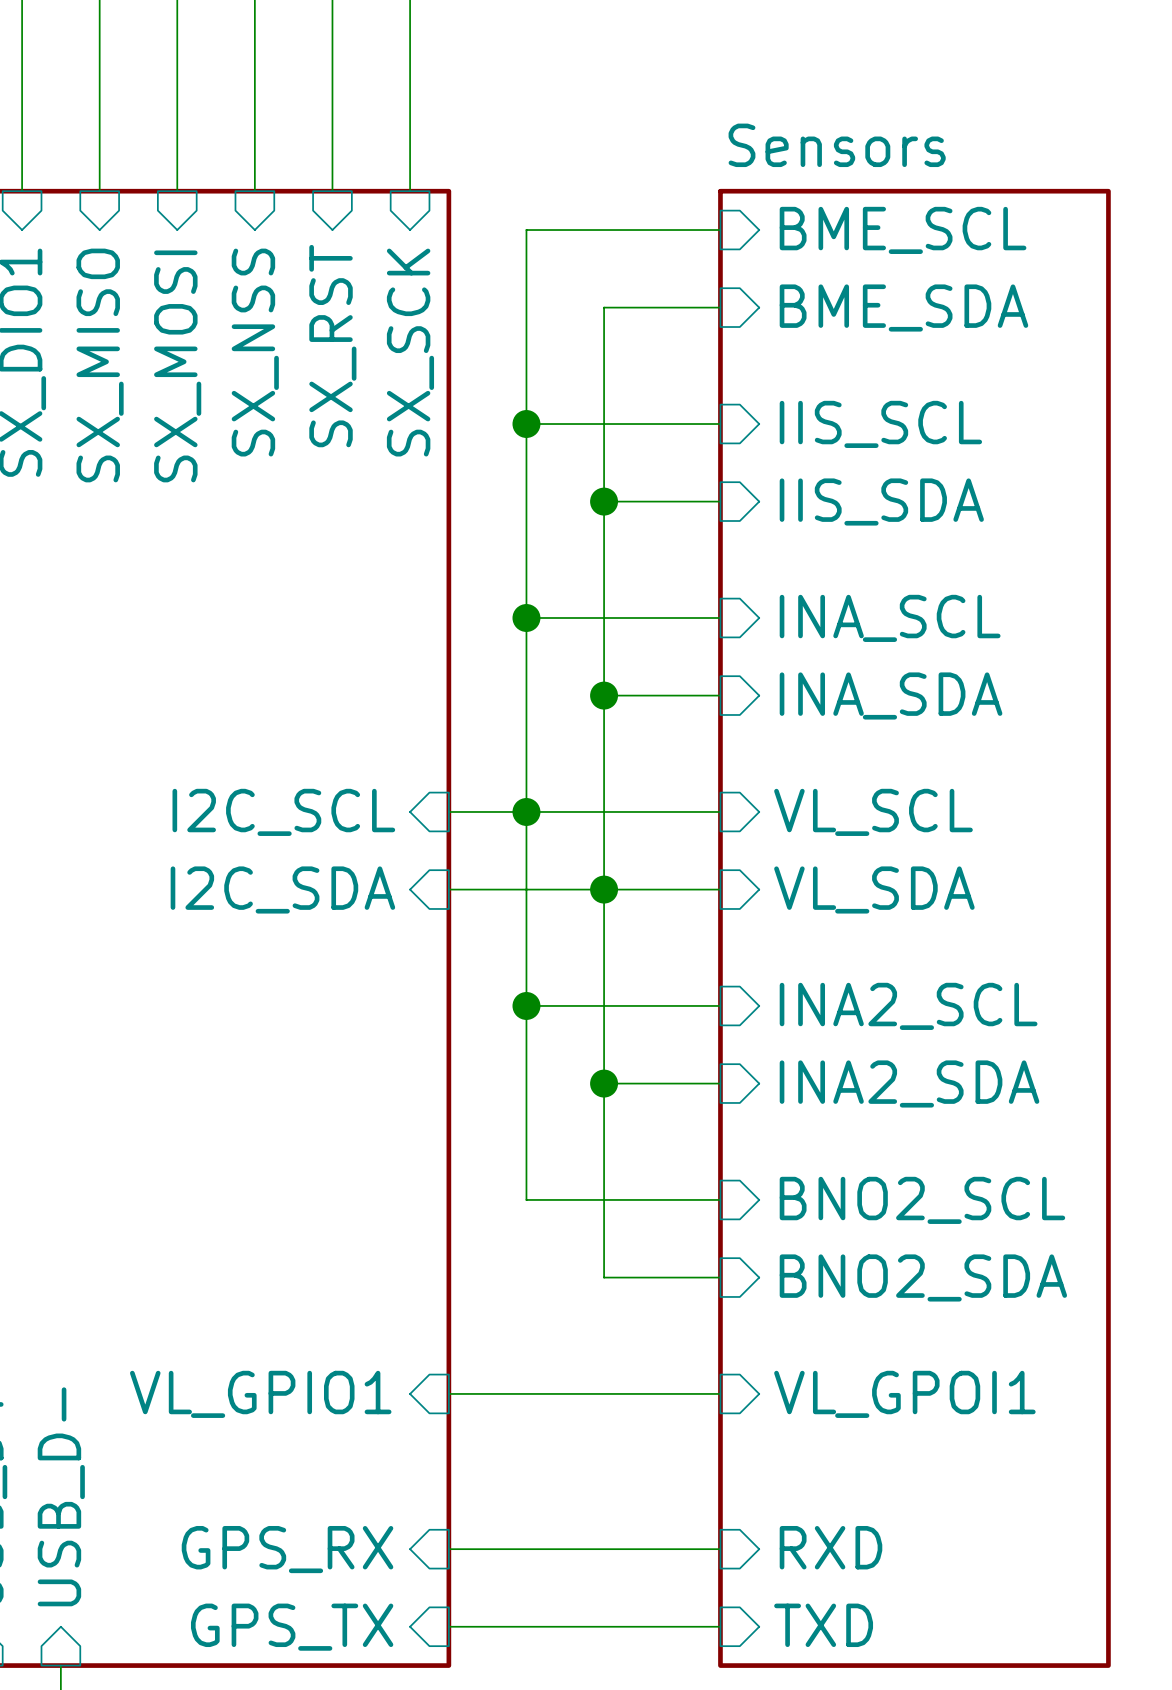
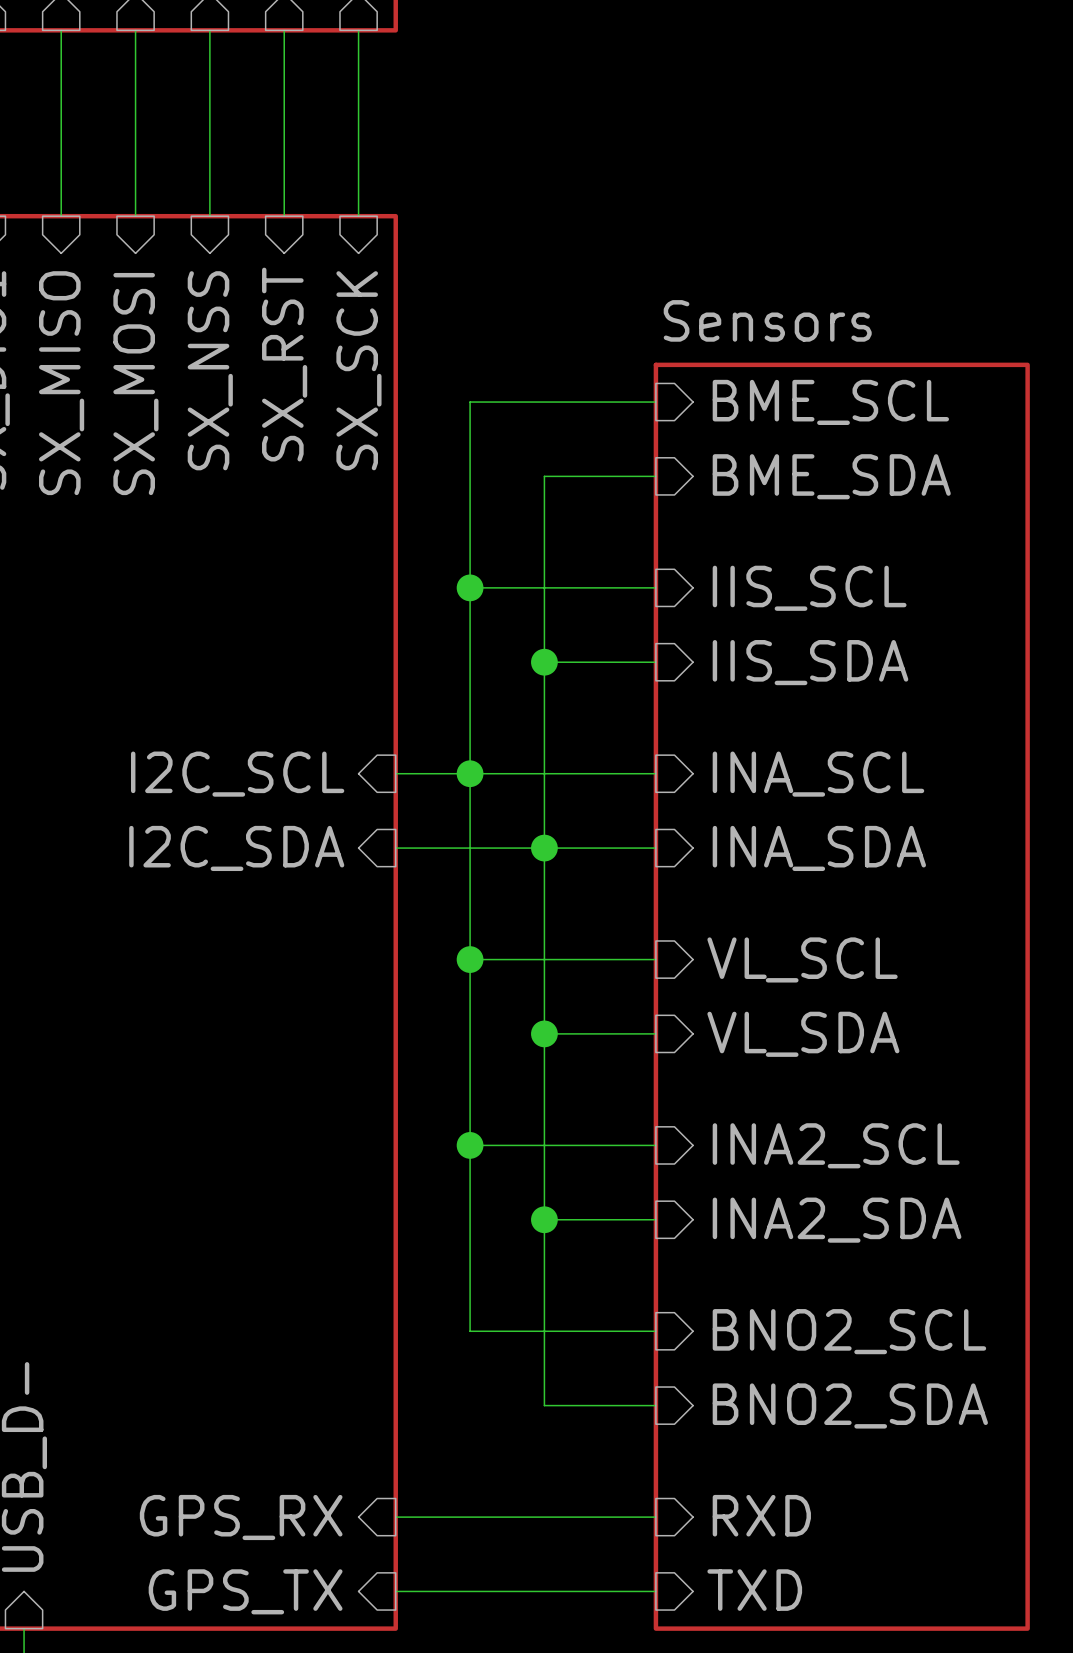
wire: (720, 230) (526, 230) (526, 385) -> (655, 402) (470, 402)
sheet pin position: BME_SCL (903, 230) -> BME_SCL (830, 402)
wire: (720, 307) (604, 307) (604, 462) -> (655, 476) (544, 476)
sheet pin position: BME_SDA (903, 308) -> BME_SDA (831, 476)
wire: (526, 424) (720, 424) -> (470, 1145) (655, 1145)
junction: (526, 424) -> none
sheet pin position: IIS_SCL (880, 424) -> IIS_SCL (809, 588)
wire: (604, 501) (720, 501) -> (544, 1219) (655, 1219)
junction: (604, 501) -> none
sheet pin position: IIS_SDA (881, 501) -> IIS_SDA (810, 662)
wire: (526, 617) (720, 617) -> (470, 587) (655, 587)
junction position: (526, 617) -> (470, 587)
sheet pin position: INA_SCL (890, 618) -> INA_SCL (818, 774)
wire: (604, 695) (720, 695) -> (544, 662) (655, 662)
junction position: (604, 695) -> (544, 662)
sheet pin position: INA_SDA (891, 695) -> INA_SDA (819, 848)
wire: (448, 811) (720, 811) -> (395, 773) (655, 773)
junction position: (526, 811) -> (470, 773)
sheet pin position: I2C_SCL (283, 812) -> I2C_SCL (237, 774)
sheet pin position: VL_SCL (873, 812) -> VL_SCL (802, 959)
sheet pin position: I2C_SDA (282, 889) -> I2C_SDA (236, 848)
wire: (448, 889) (720, 889) -> (395, 848) (655, 848)
junction position: (604, 889) -> (544, 848)
sheet pin position: VL_SDA (874, 889) -> VL_SDA (803, 1034)
sheet Sensors: (914, 928) -> none
wire: (526, 1005) (720, 1005) -> (470, 959) (655, 959)
junction position: (526, 1005) -> (470, 959)
sheet Sensors: none -> (841, 996)
sheet pin position: INA2_SCL (908, 1006) -> INA2_SCL (836, 1145)
wire: (604, 1083) (720, 1083) -> (544, 1033) (655, 1033)
junction position: (604, 1083) -> (544, 1033)
sheet pin position: INA2_SDA (909, 1083) -> INA2_SDA (837, 1220)
junction: none -> (470, 1145)
wire: (526, 1199) (720, 1199) -> (470, 1182) (470, 1331) (655, 1331)
sheet pin position: BNO2_SCL (922, 1200) -> BNO2_SCL (849, 1331)
junction: none -> (544, 1219)
wire: (604, 1277) (720, 1277) -> (544, 1256) (544, 1405) (655, 1405)
sheet pin position: BNO2_SDA (923, 1277) -> BNO2_SDA (850, 1405)
wire: (448, 1393) (720, 1393) -> none
sheet pin: VL_GPIO1 (260, 1394) -> none
sheet pin: VL_GPOI1 (904, 1394) -> none

